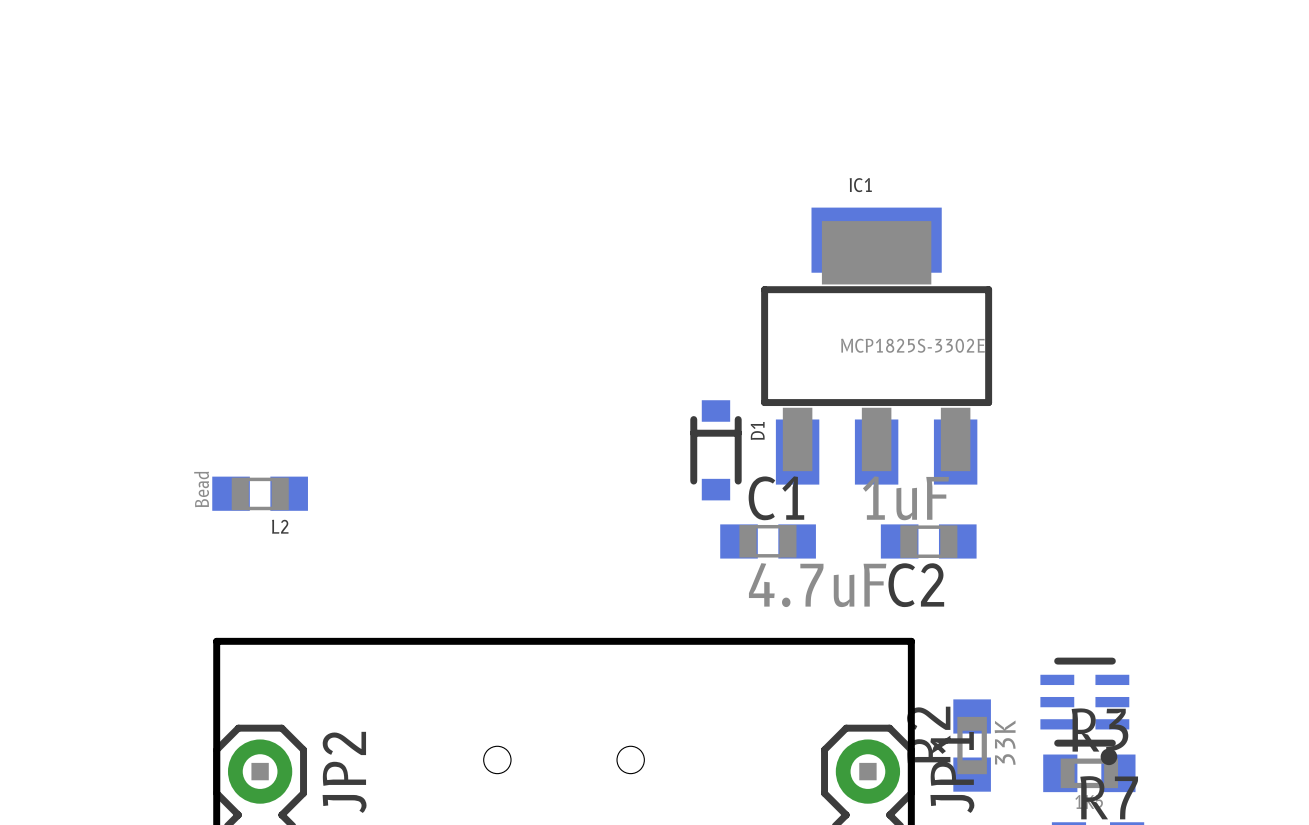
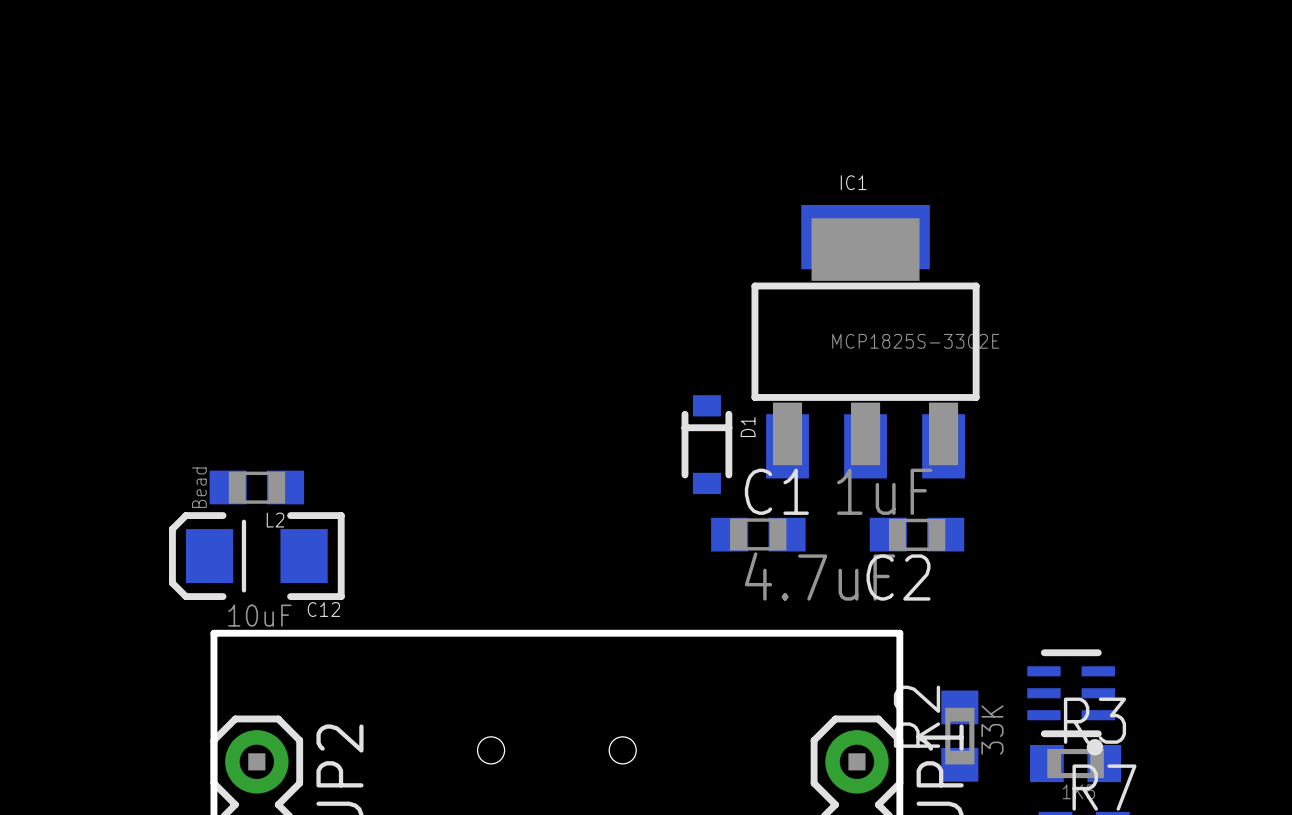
C12: none -> 10uF (256, 556)

